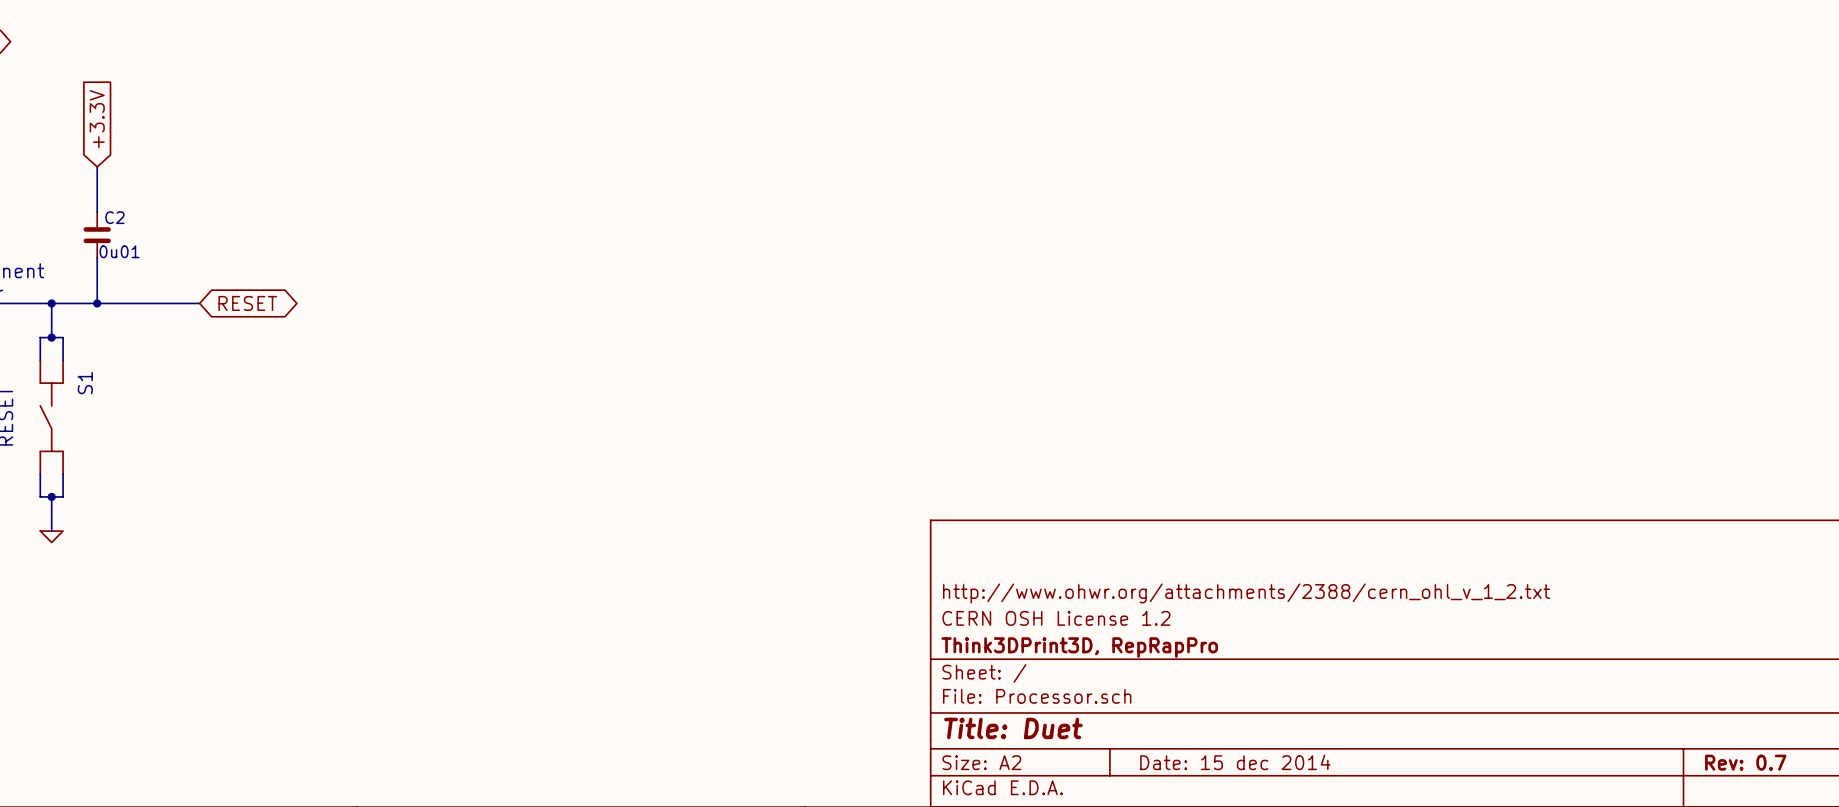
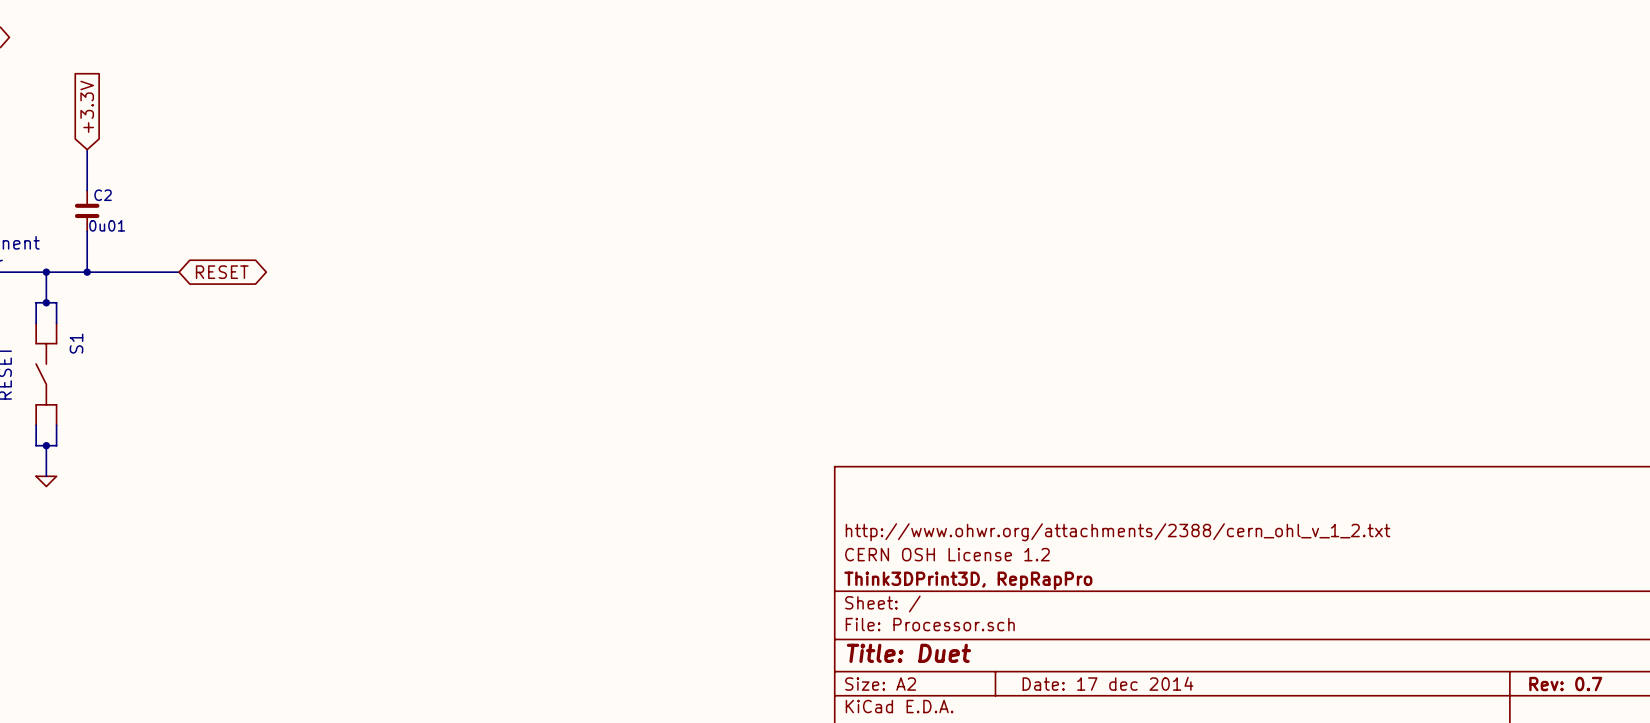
title block: Date: 15 dec 2014 (1235, 762) -> Date: 17 dec 2014 (1107, 683)

